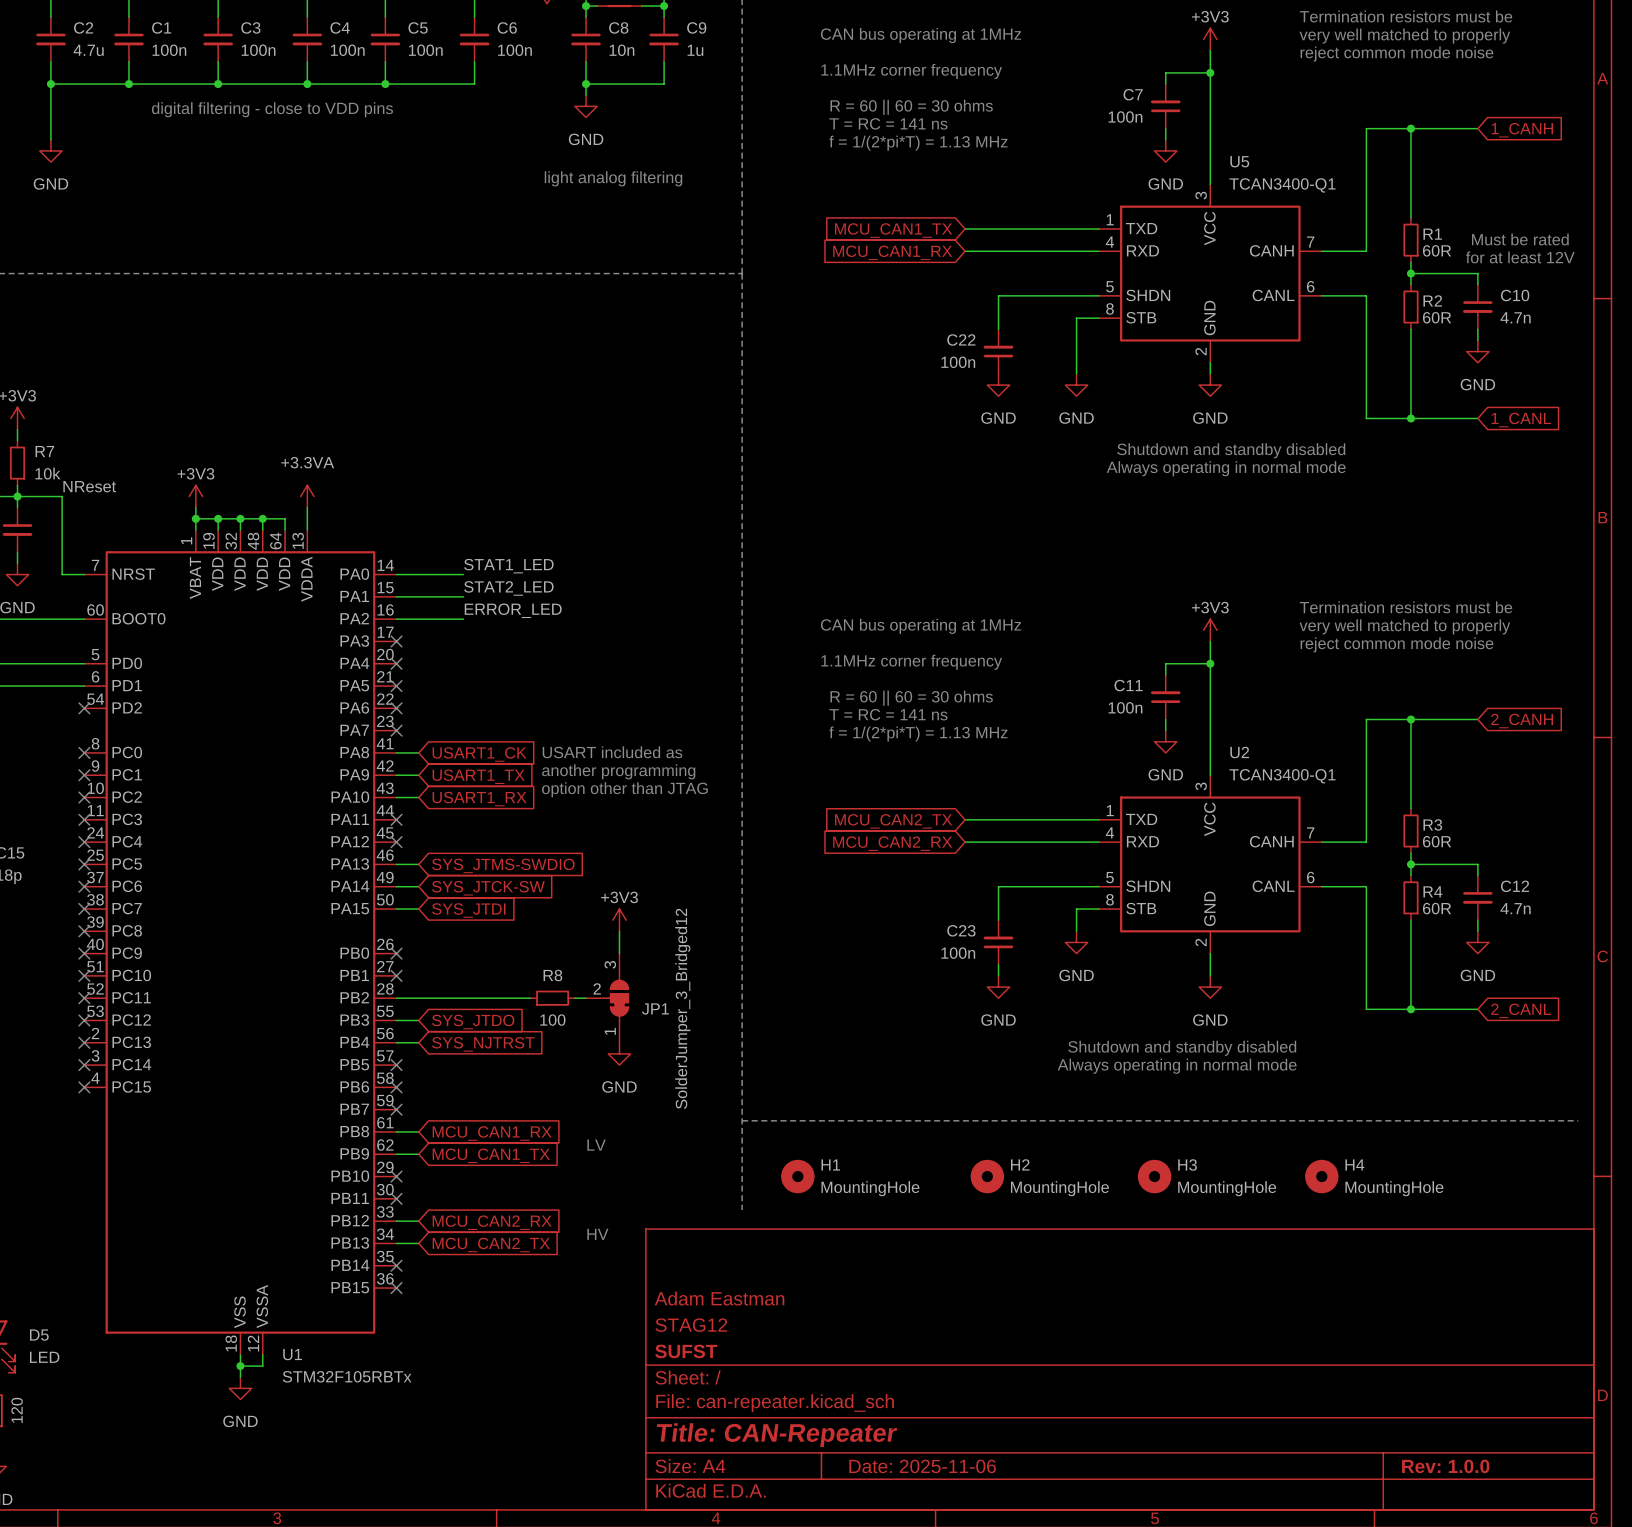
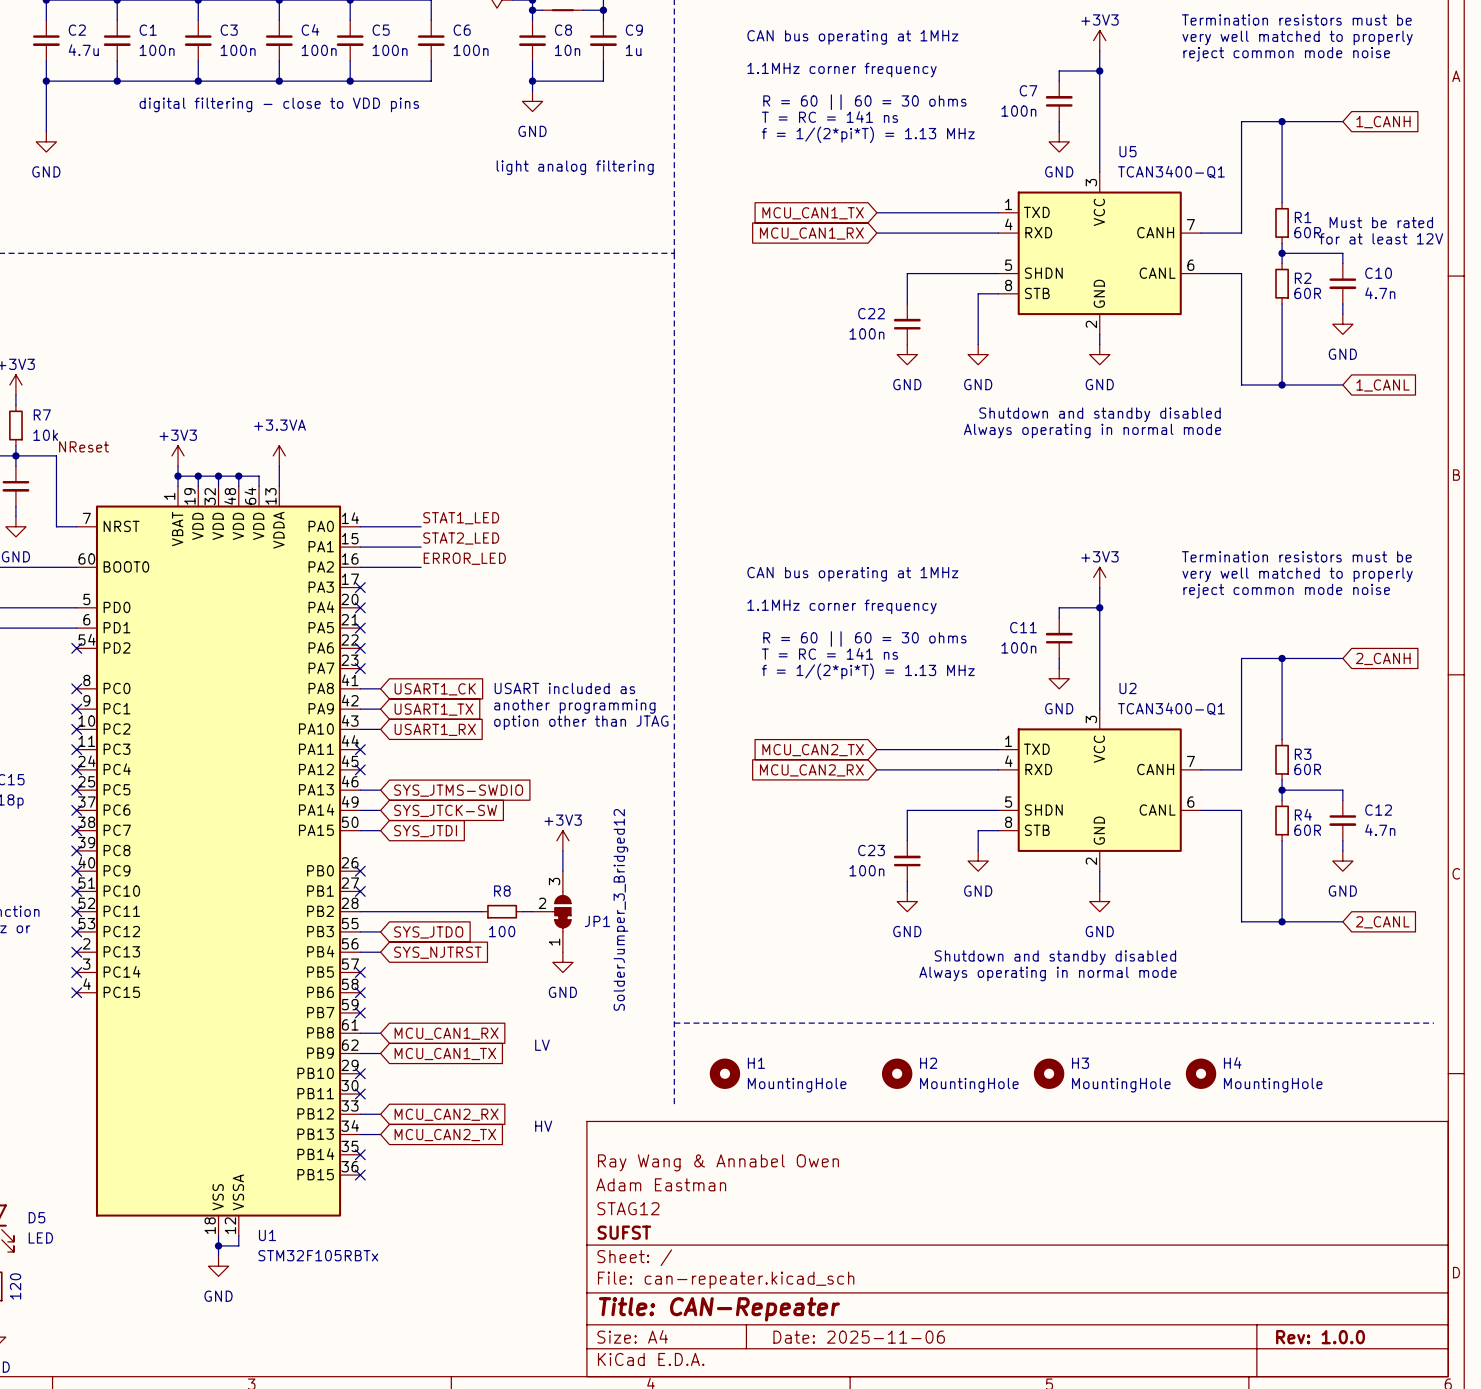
title block: none -> Ray Wang & Annabel Owen (718, 1162)

